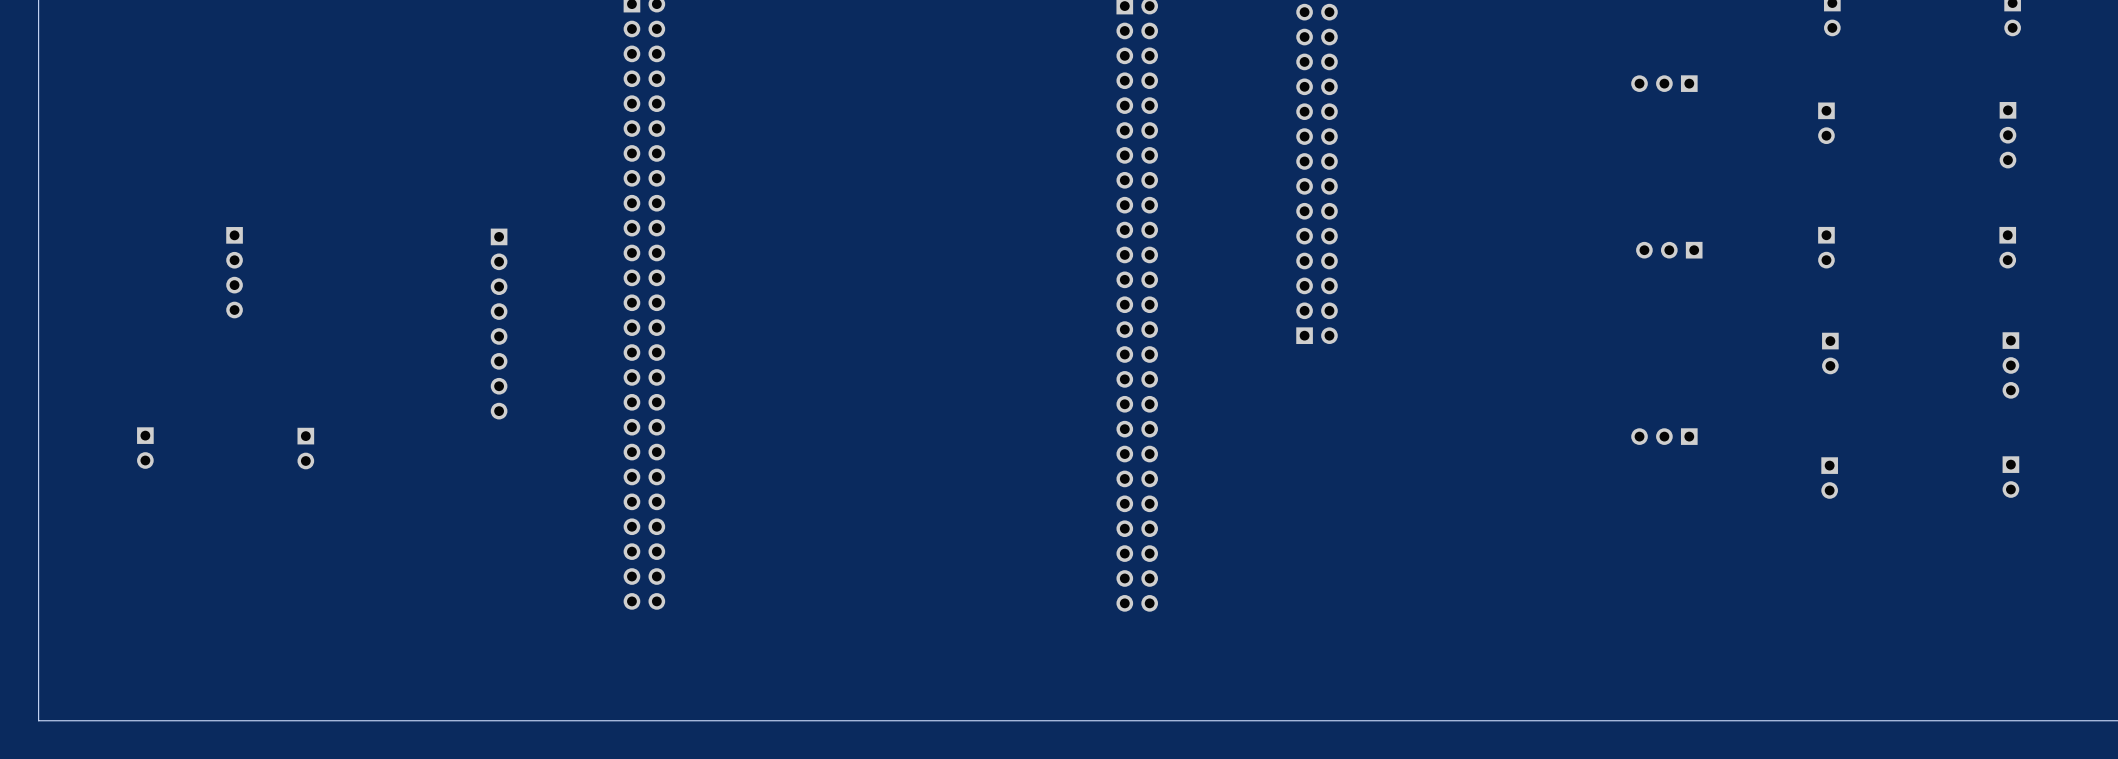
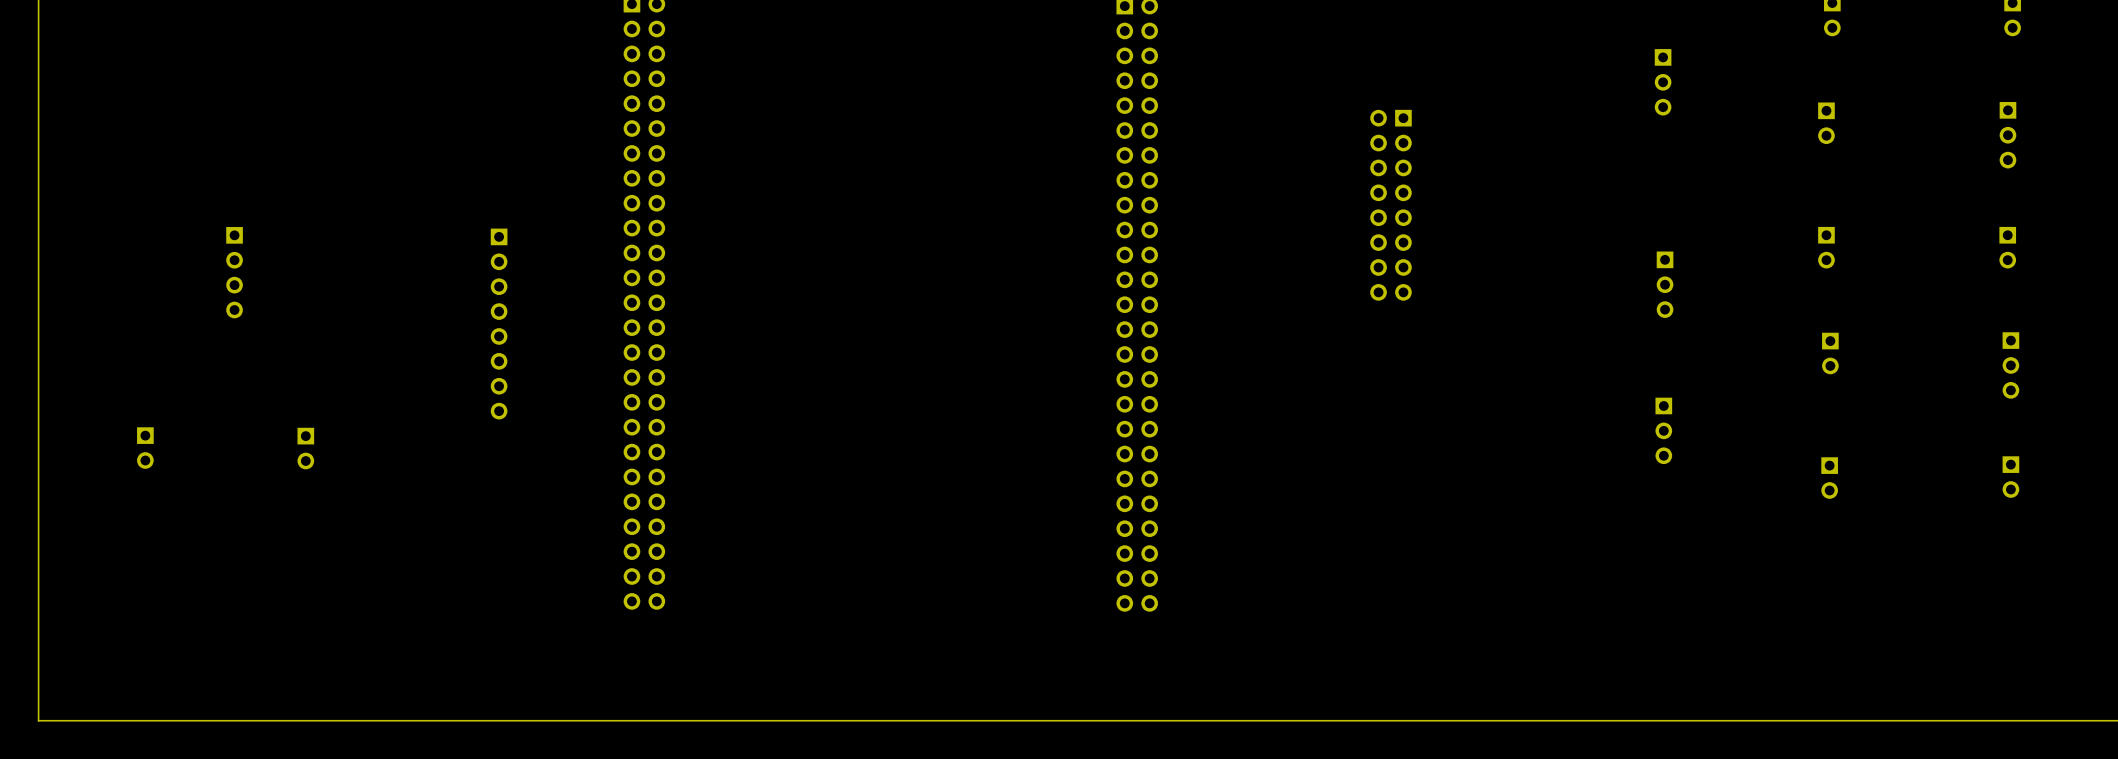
part rotation: 0° (1664, 83) -> 90° counterclockwise (1663, 82)
part: (1317, 173) -> none
part: none -> (1390, 205)
part rotation: 0° (1669, 250) -> 90° counterclockwise (1665, 284)
part rotation: 0° (1664, 436) -> 90° counterclockwise (1663, 430)

